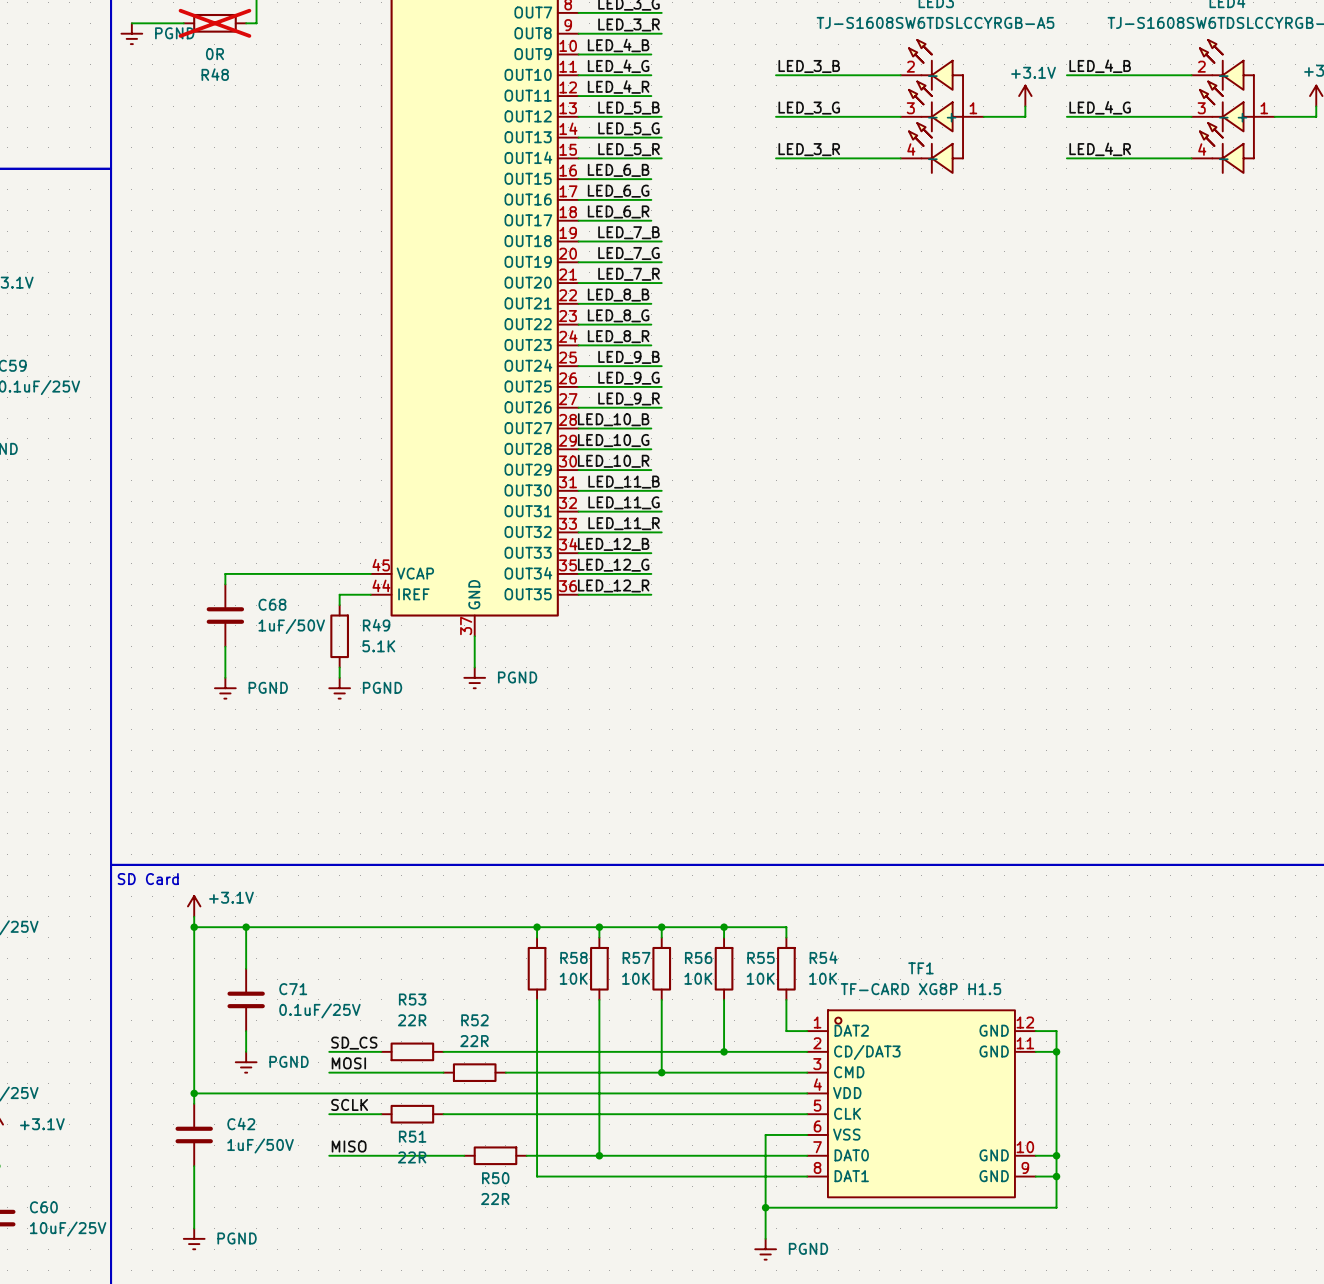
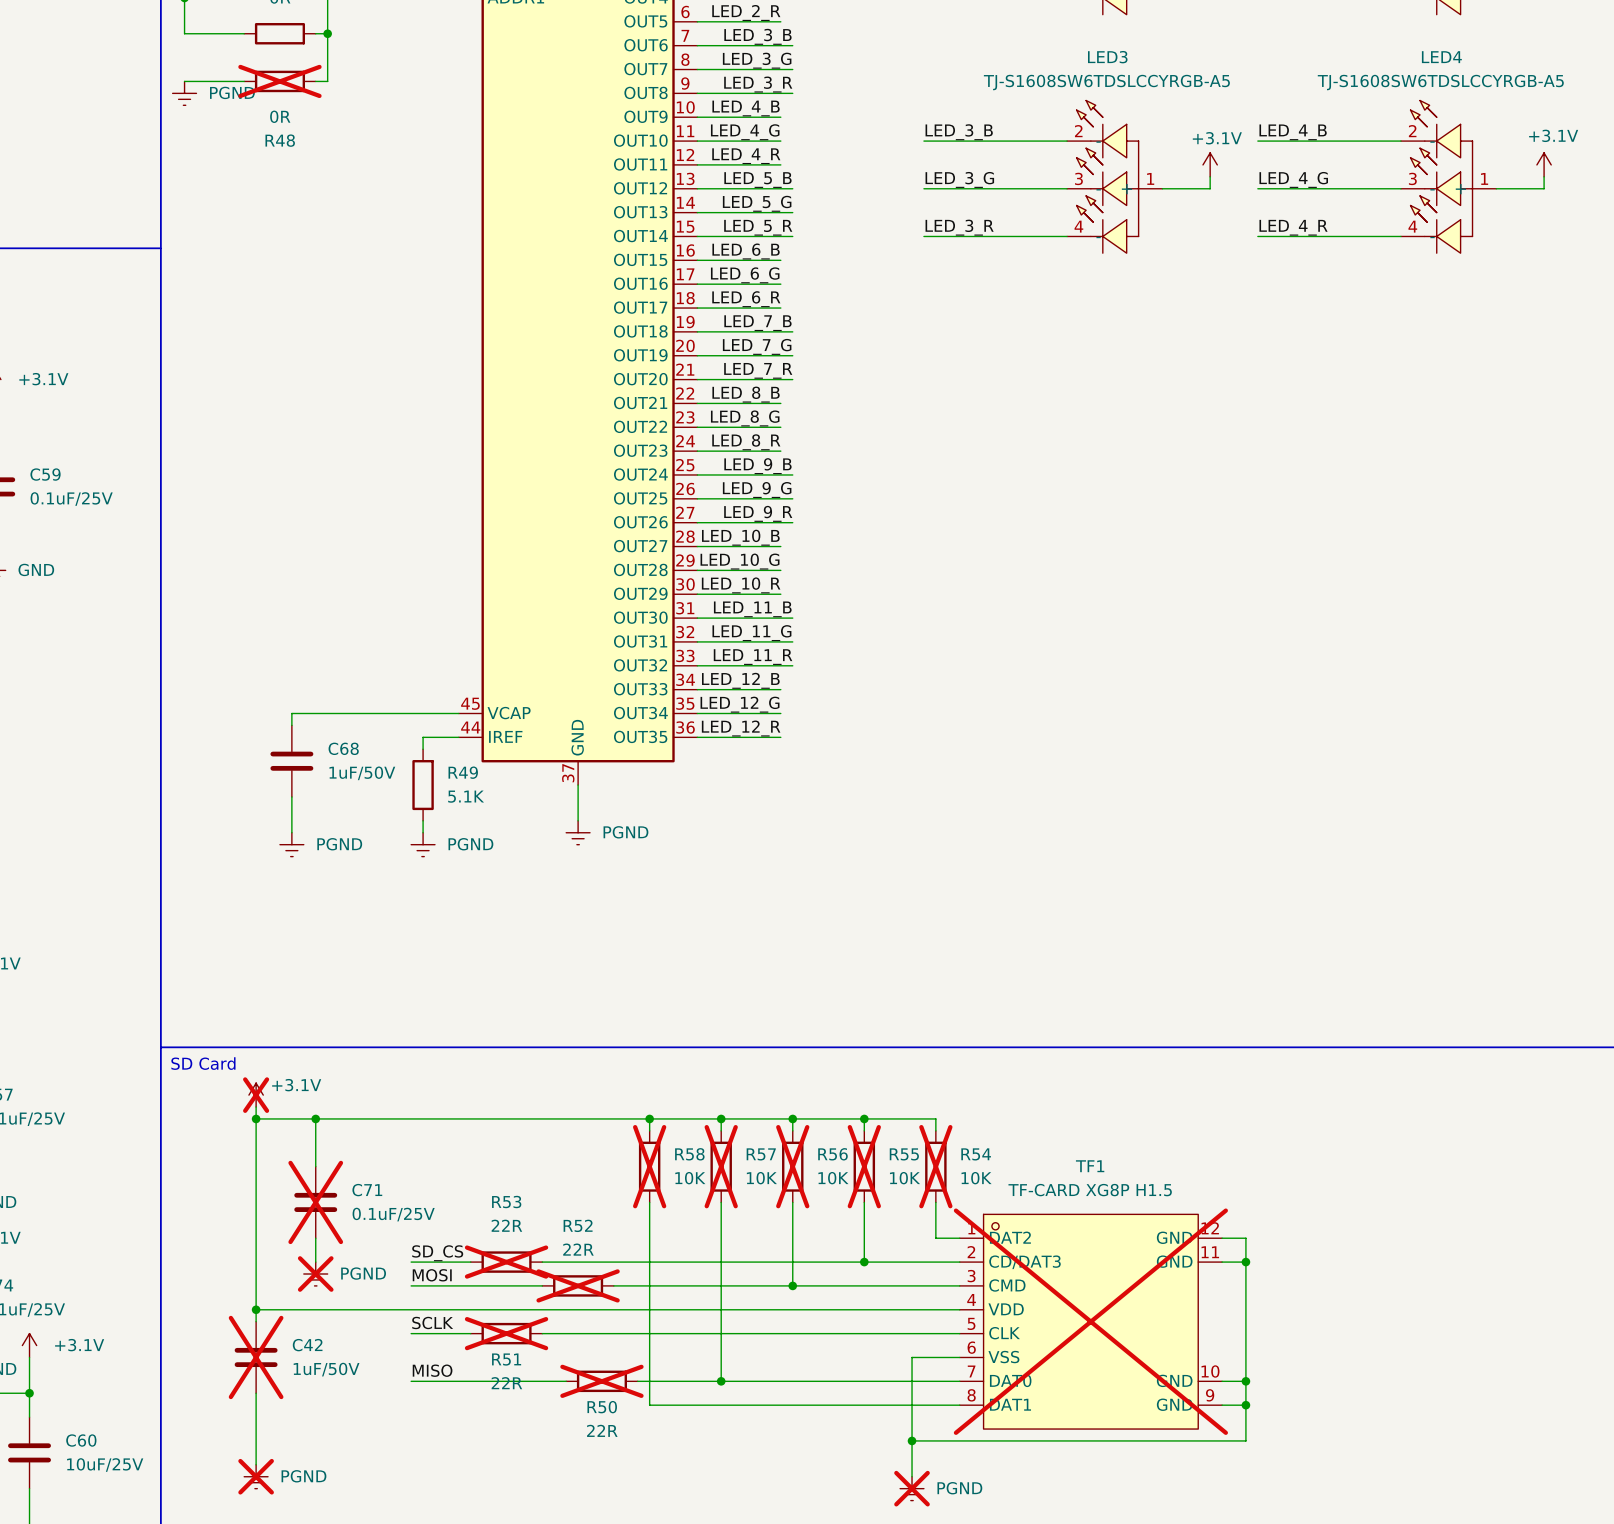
power symbol do-not-place cross: none -> (256, 1095)
R58 do-not-place cross: none -> (649, 1166)
R57 do-not-place cross: none -> (721, 1166)
R56 do-not-place cross: none -> (792, 1166)
R55 do-not-place cross: none -> (864, 1166)
R54 do-not-place cross: none -> (935, 1166)
C71 do-not-place cross: none -> (315, 1202)
R53 do-not-place cross: none -> (506, 1262)
power symbol do-not-place cross: none -> (315, 1274)
R52 do-not-place cross: none -> (578, 1285)
TF1 do-not-place cross: none -> (1090, 1321)
R51 do-not-place cross: none -> (506, 1333)
C42 do-not-place cross: none -> (256, 1357)
R50 do-not-place cross: none -> (601, 1381)
power symbol do-not-place cross: none -> (256, 1476)
power symbol do-not-place cross: none -> (912, 1488)

